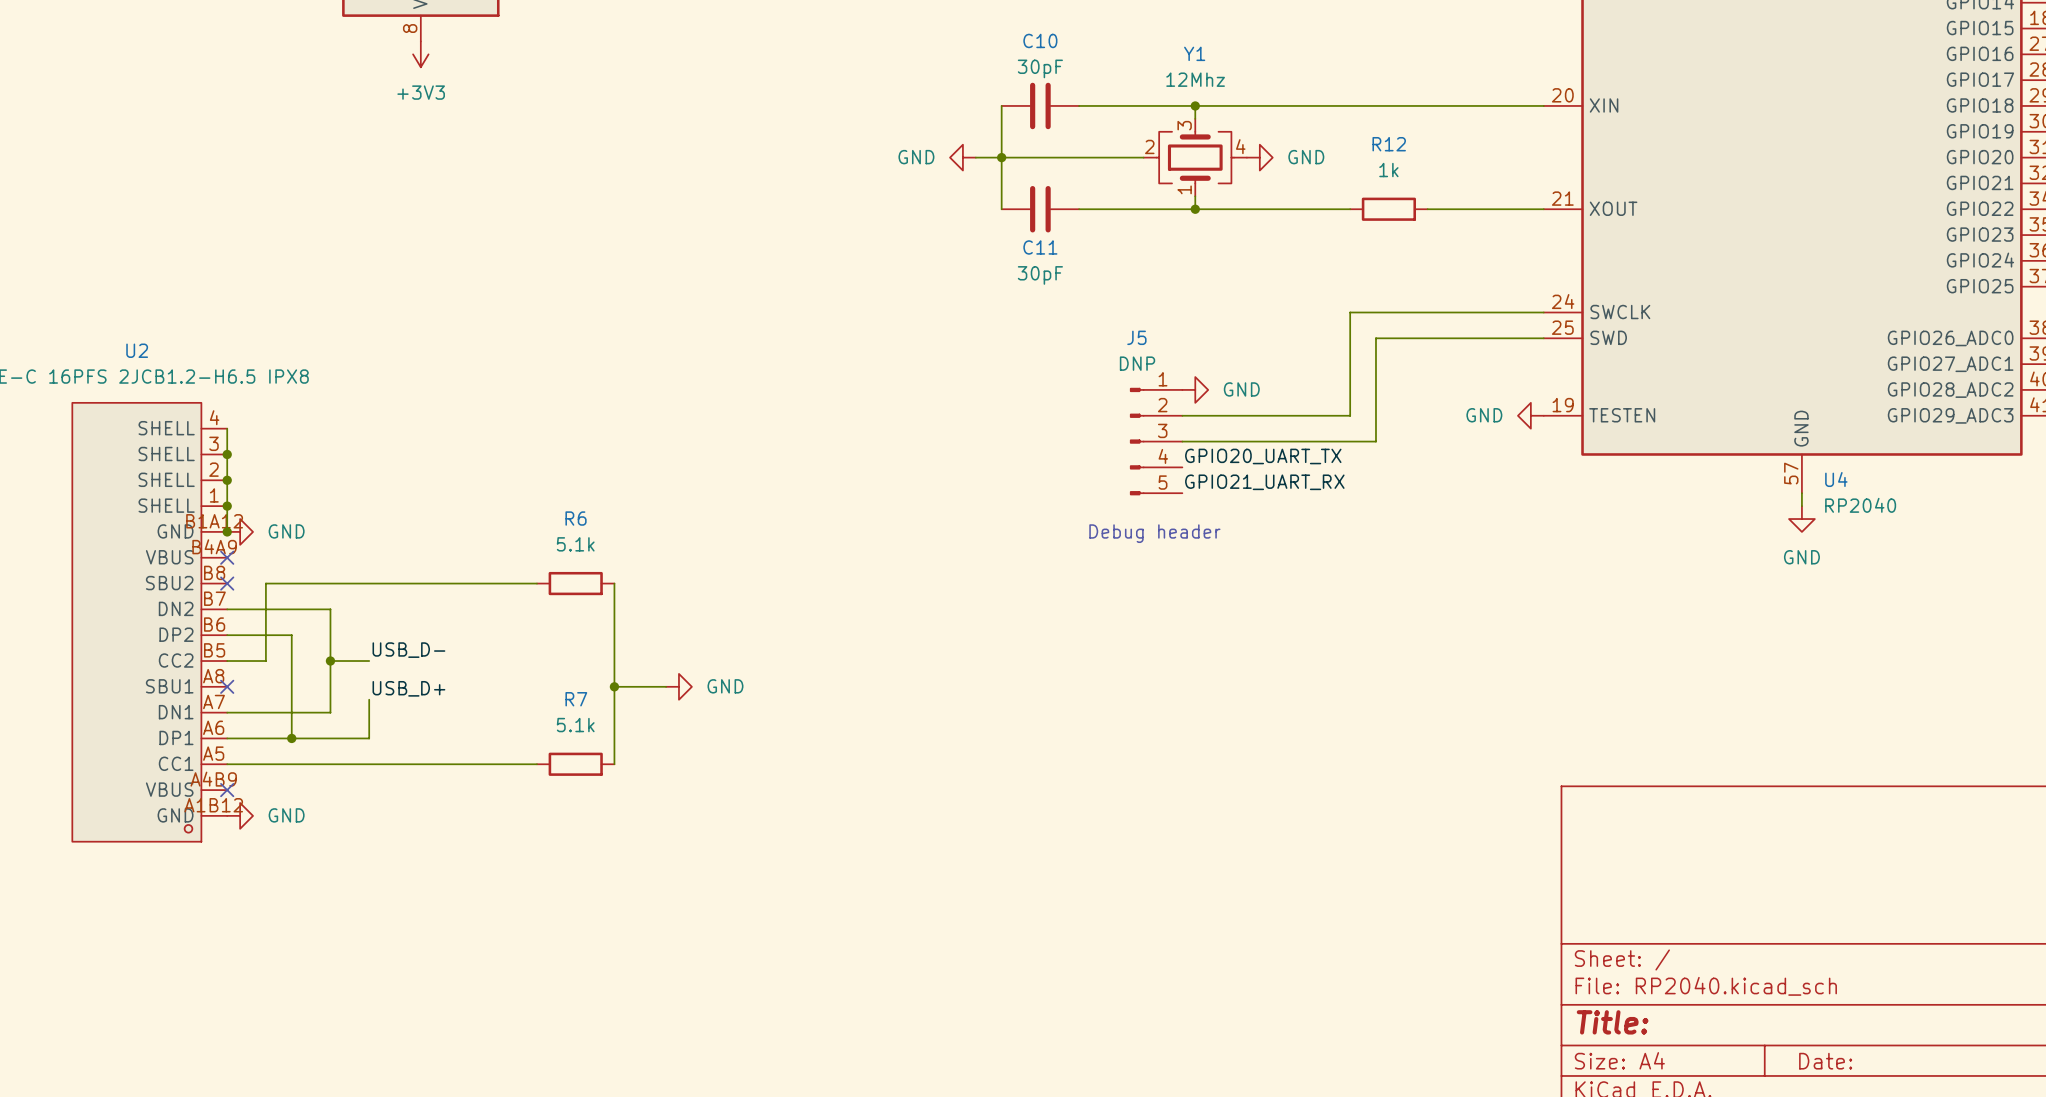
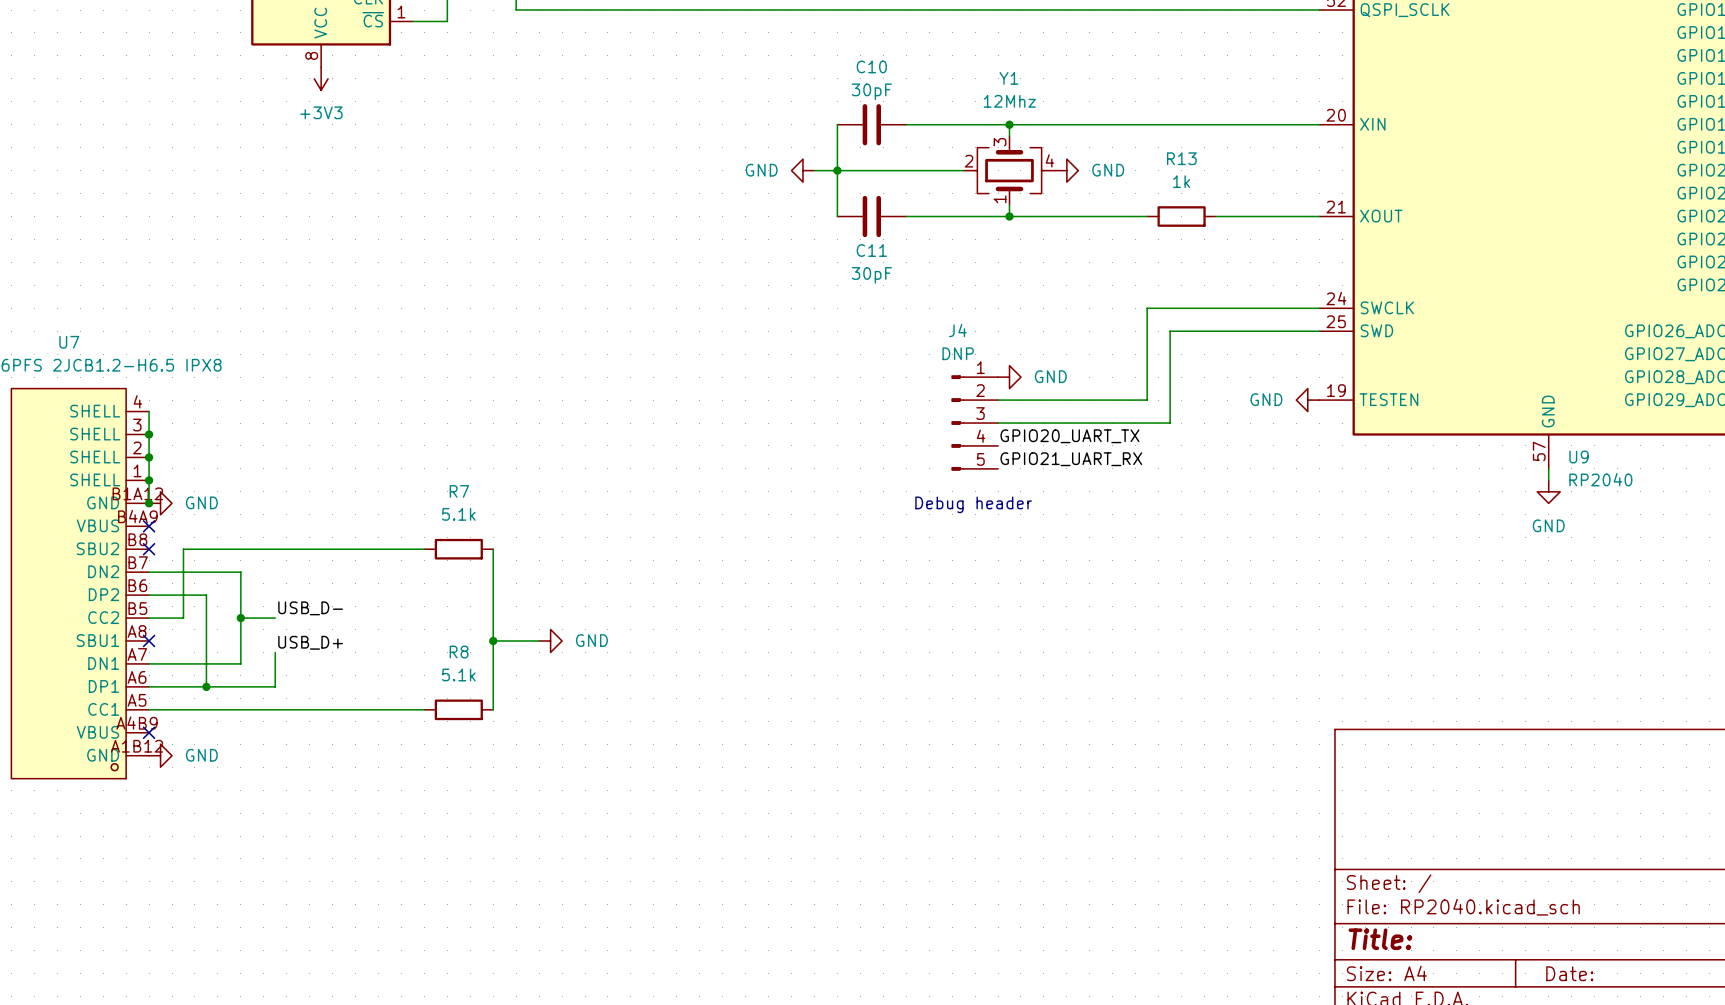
R12 name: R12 (1389, 144) -> R13 (1181, 158)
J5 name: J5 (1136, 337) -> J4 (957, 330)
U2 name: U2 (137, 350) -> U7 (69, 342)
U4 name: U4 (1836, 479) -> U9 (1579, 457)
R6 name: R6 (576, 518) -> R7 (459, 491)
R7 name: R7 (576, 699) -> R8 (459, 652)

